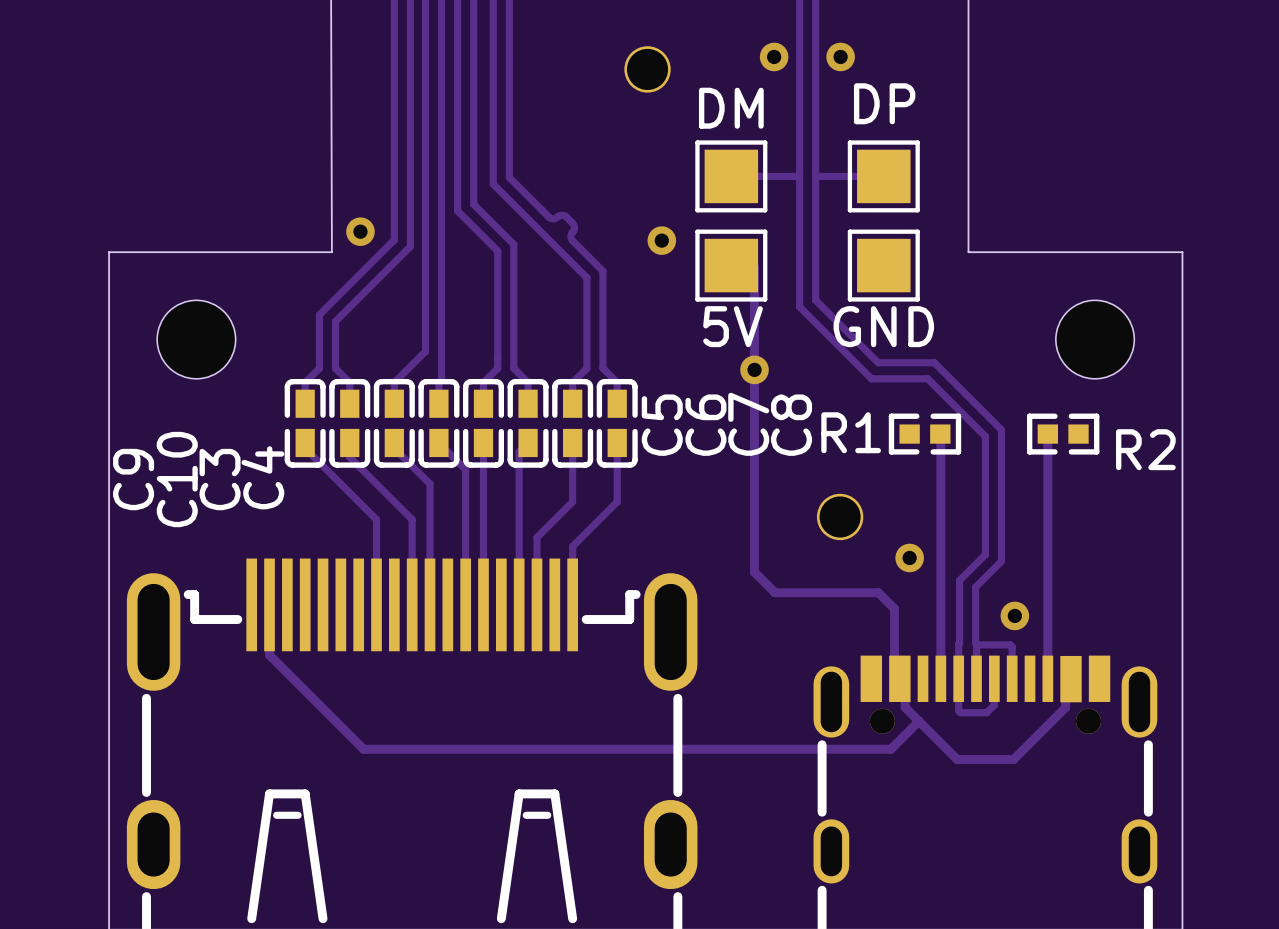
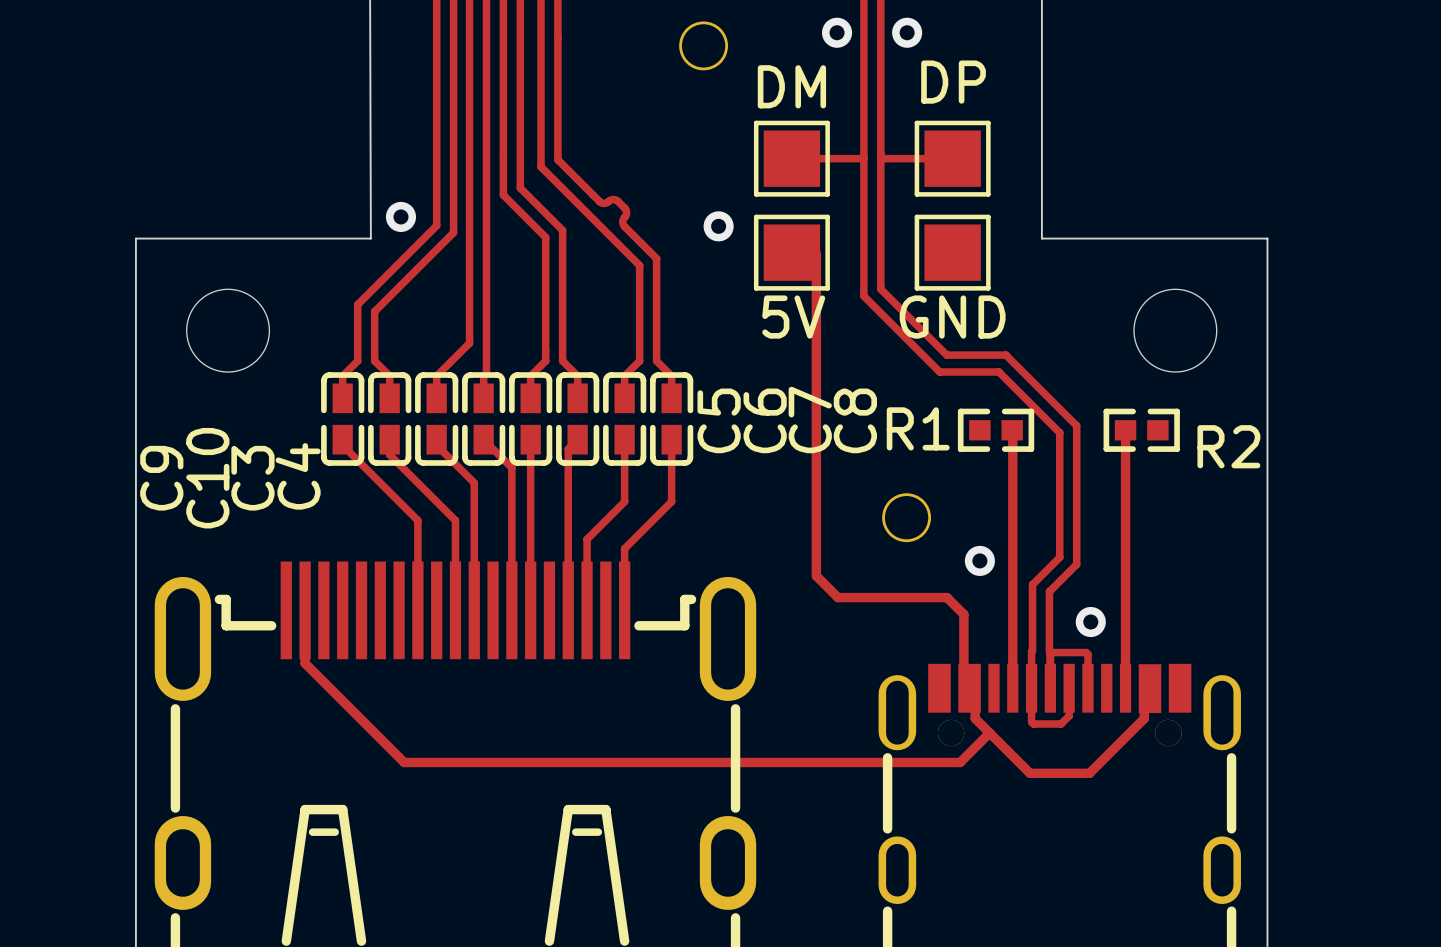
via: (754, 369) -> none

